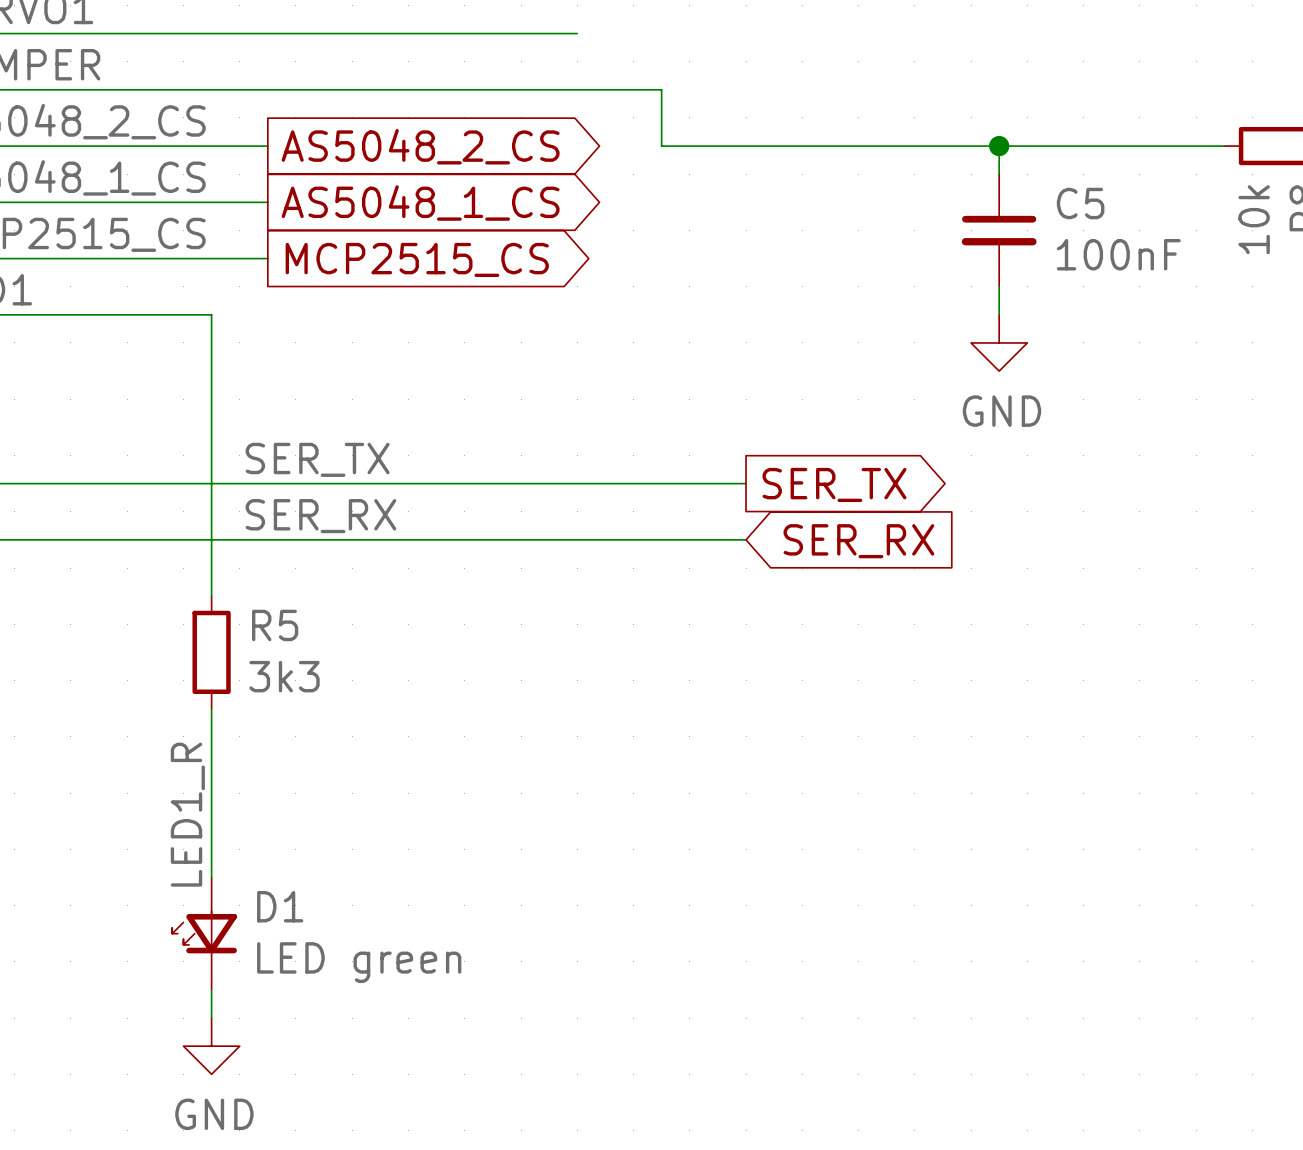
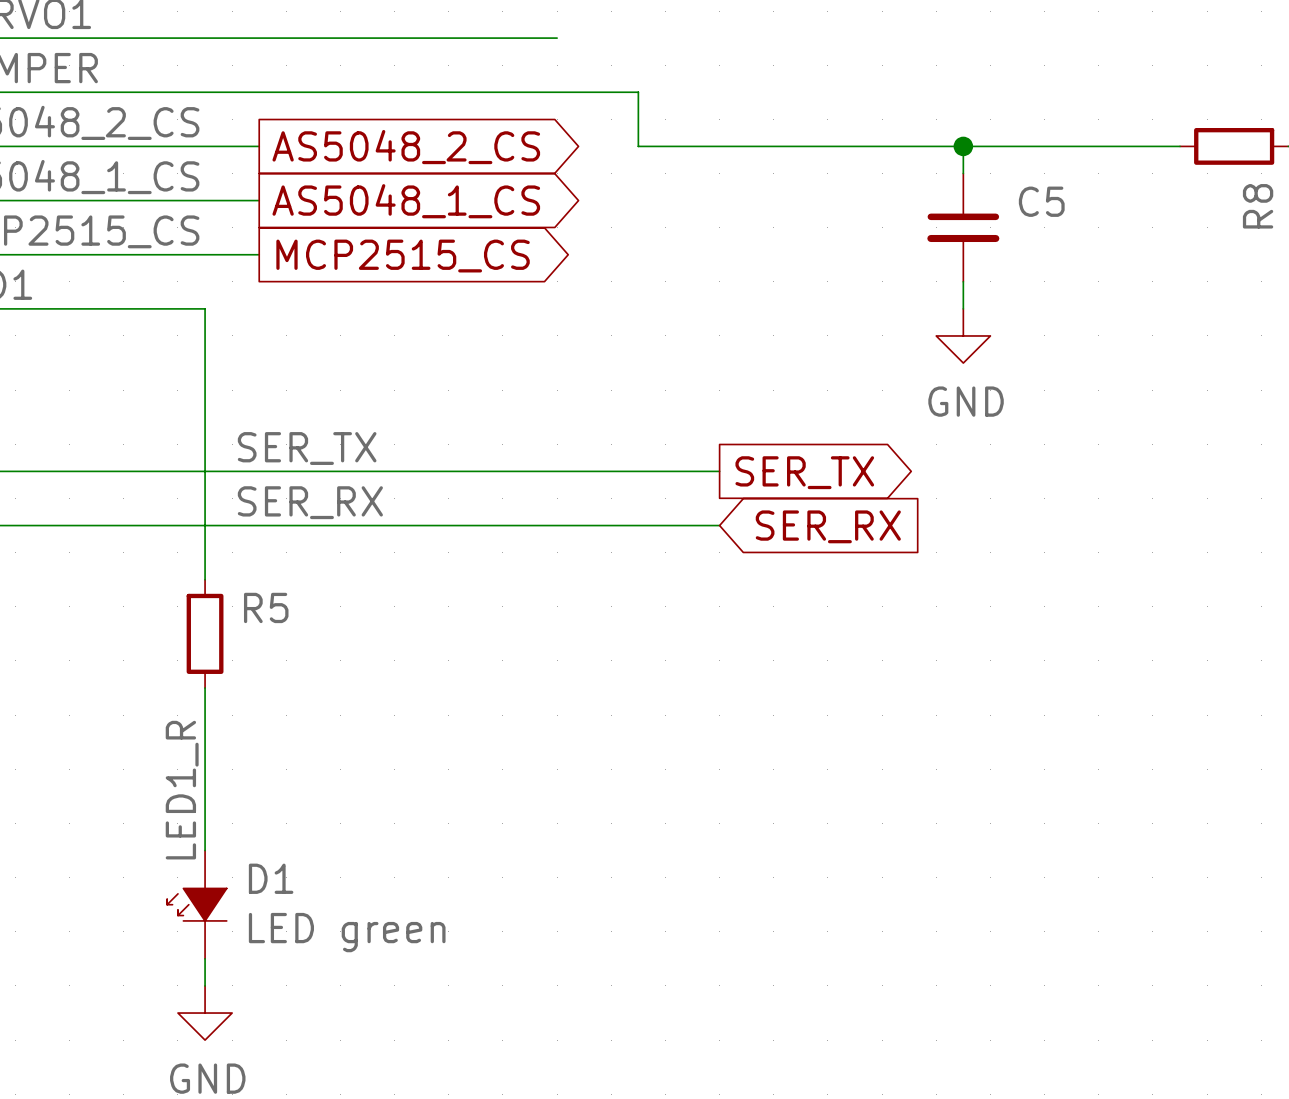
R8 value: 10k (1254, 219) -> none
C5 value: 100nF (1118, 254) -> none
R5 value: 3k3 (284, 676) -> none
D1 symbol: [172, 877, 237, 990] -> [167, 850, 227, 959]

